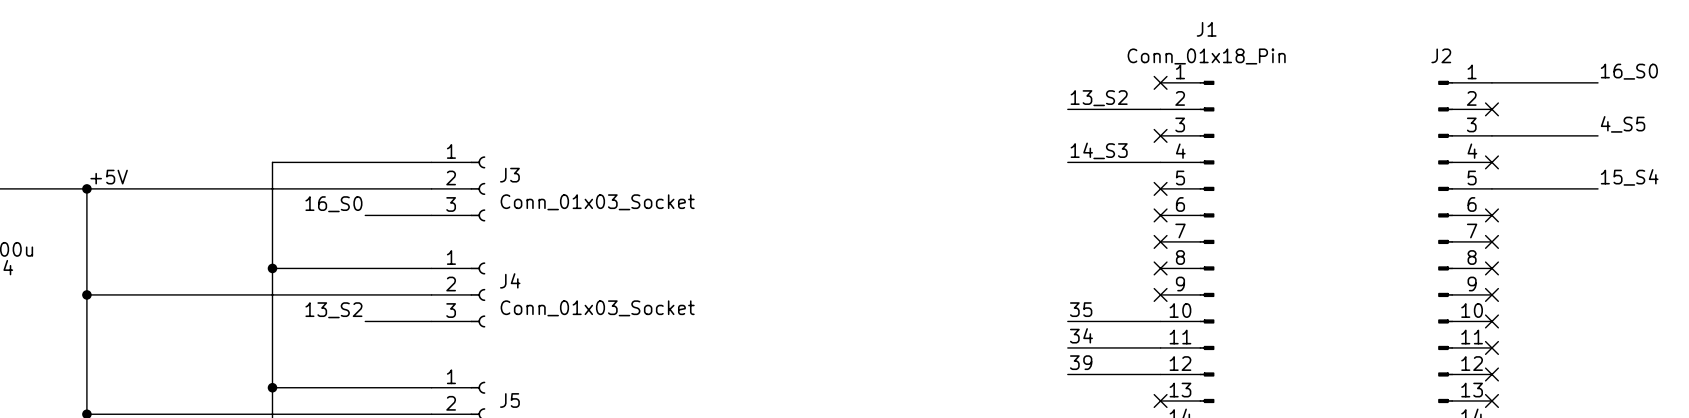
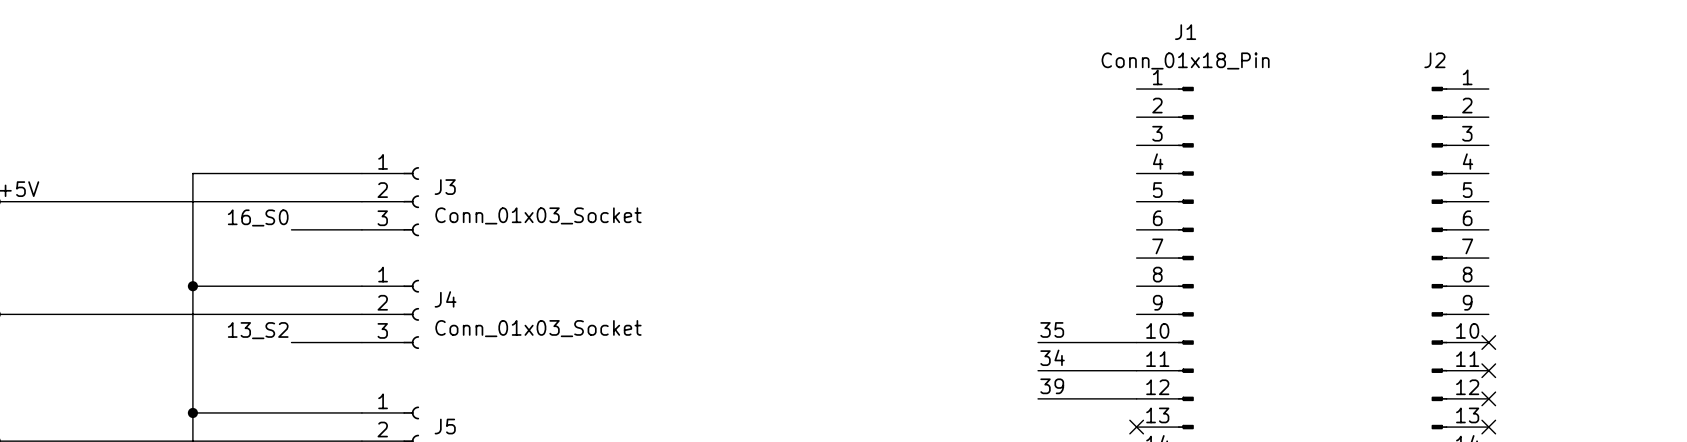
label: 16_S0 (1629, 71) -> none
no-connect mark: (1160, 82) -> none
wire: (1491, 82) (1598, 82) -> none
label: 13_S2 (1099, 98) -> none
wire: (1067, 109) (1160, 109) -> none
no-connect mark: (1491, 109) -> none
label: 4_S5 (1623, 124) -> none
no-connect mark: (1160, 135) -> none
wire: (1491, 135) (1598, 135) -> none
label: 14_S3 (1099, 150) -> none
wire: (1067, 162) (1160, 162) -> none
no-connect mark: (1491, 162) -> none
label: 15_S4 (1629, 177) -> none
no-connect mark: (1160, 188) -> none
wire: (1491, 188) (1598, 188) -> none
no-connect mark: (1160, 215) -> none
no-connect mark: (1491, 215) -> none
no-connect mark: (1160, 241) -> none
no-connect mark: (1491, 241) -> none
no-connect mark: (1160, 268) -> none
no-connect mark: (1491, 268) -> none
no-connect mark: (1160, 294) -> none
no-connect mark: (1491, 294) -> none

